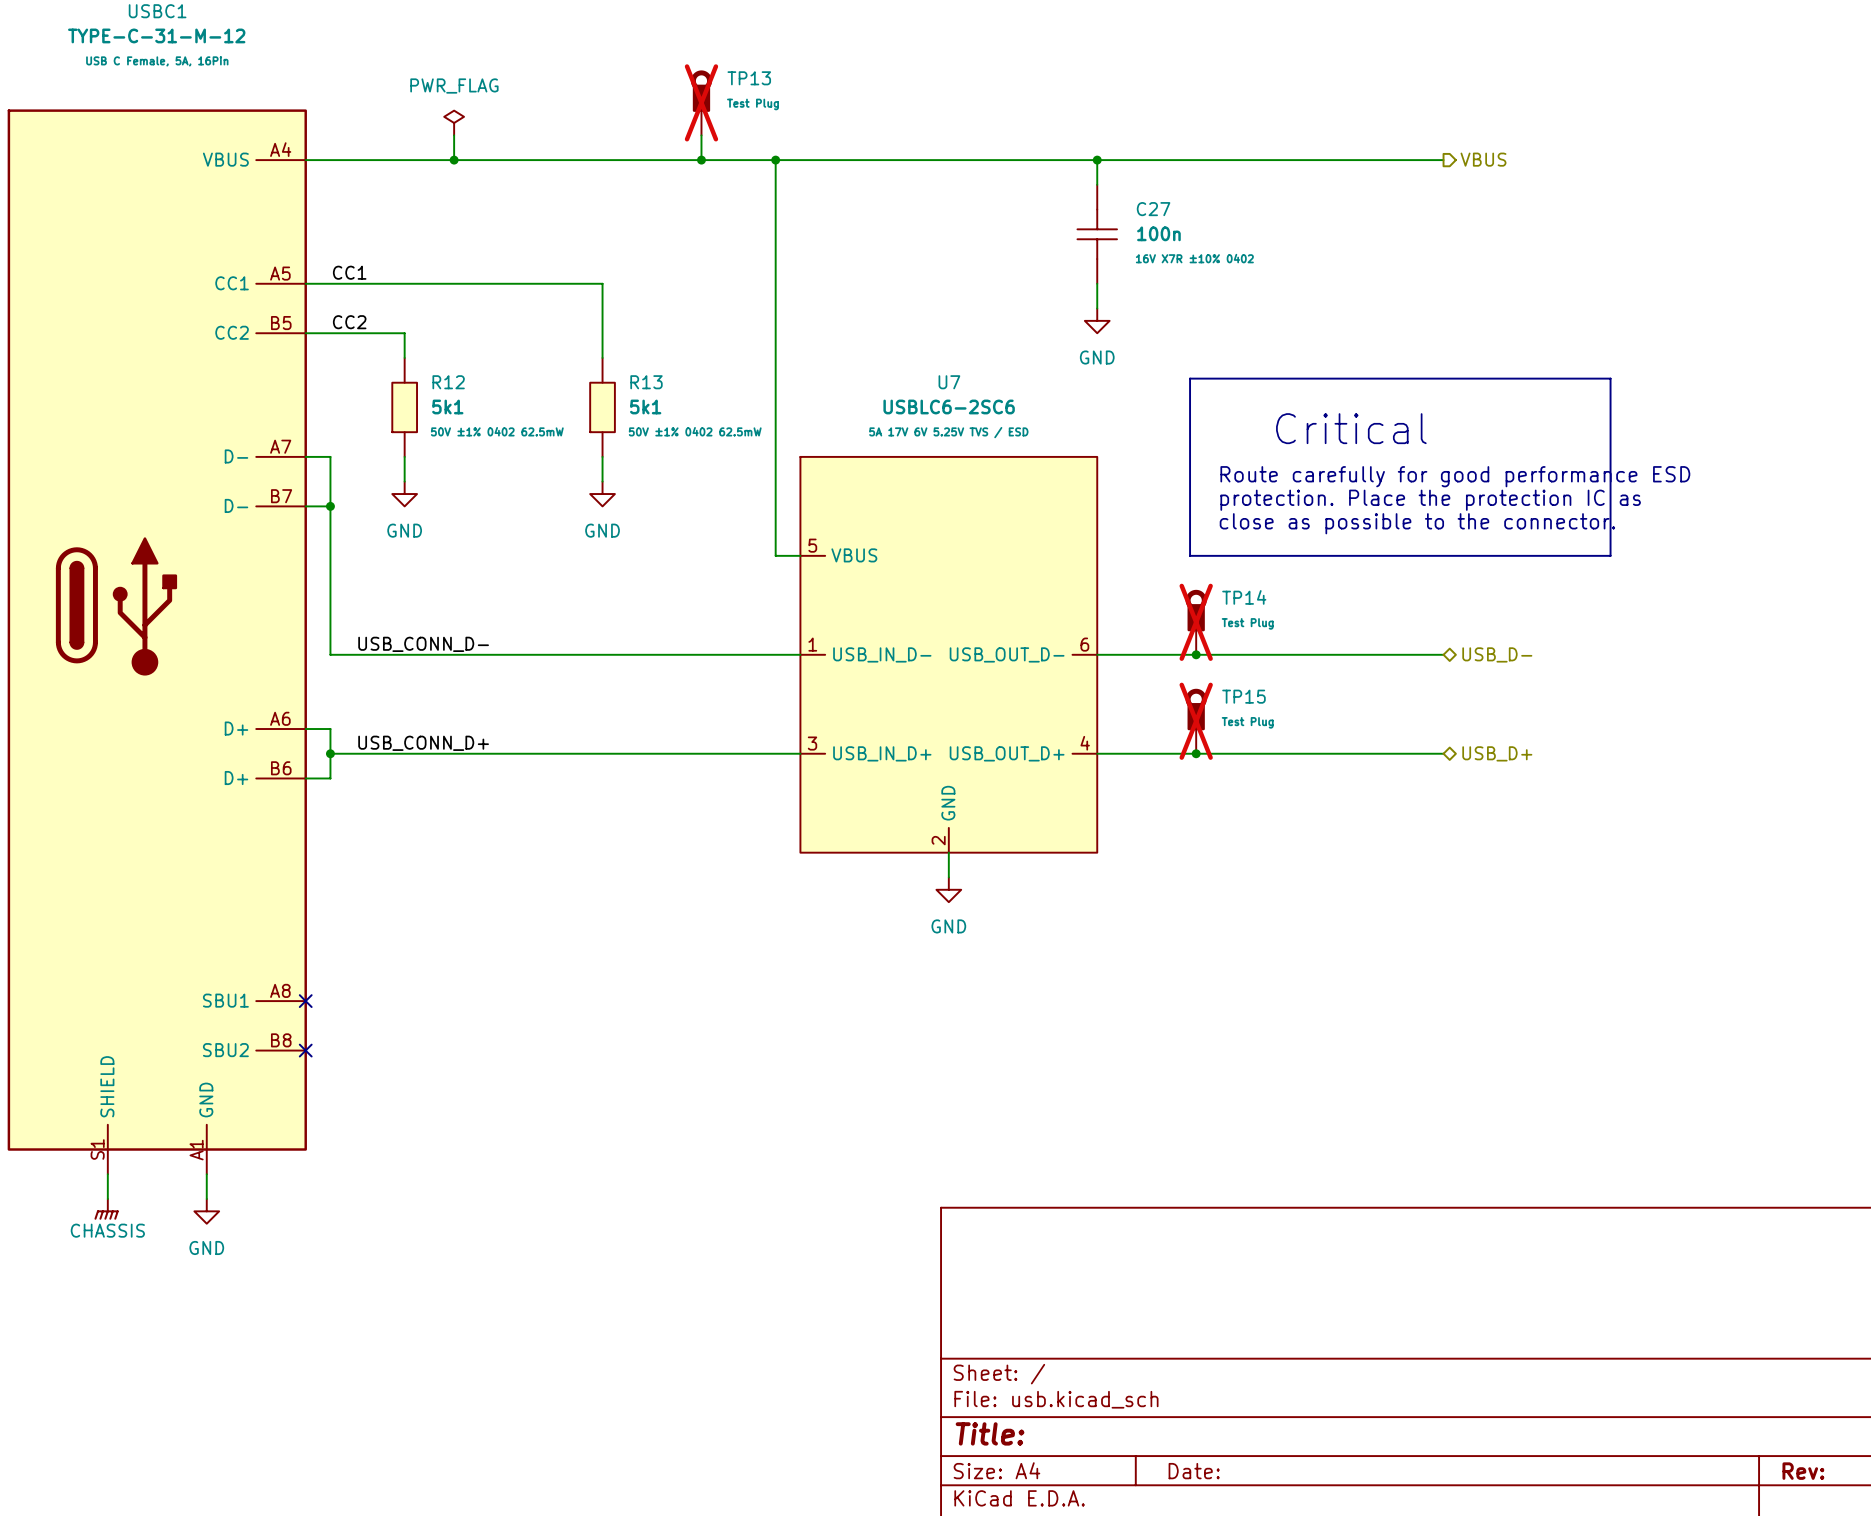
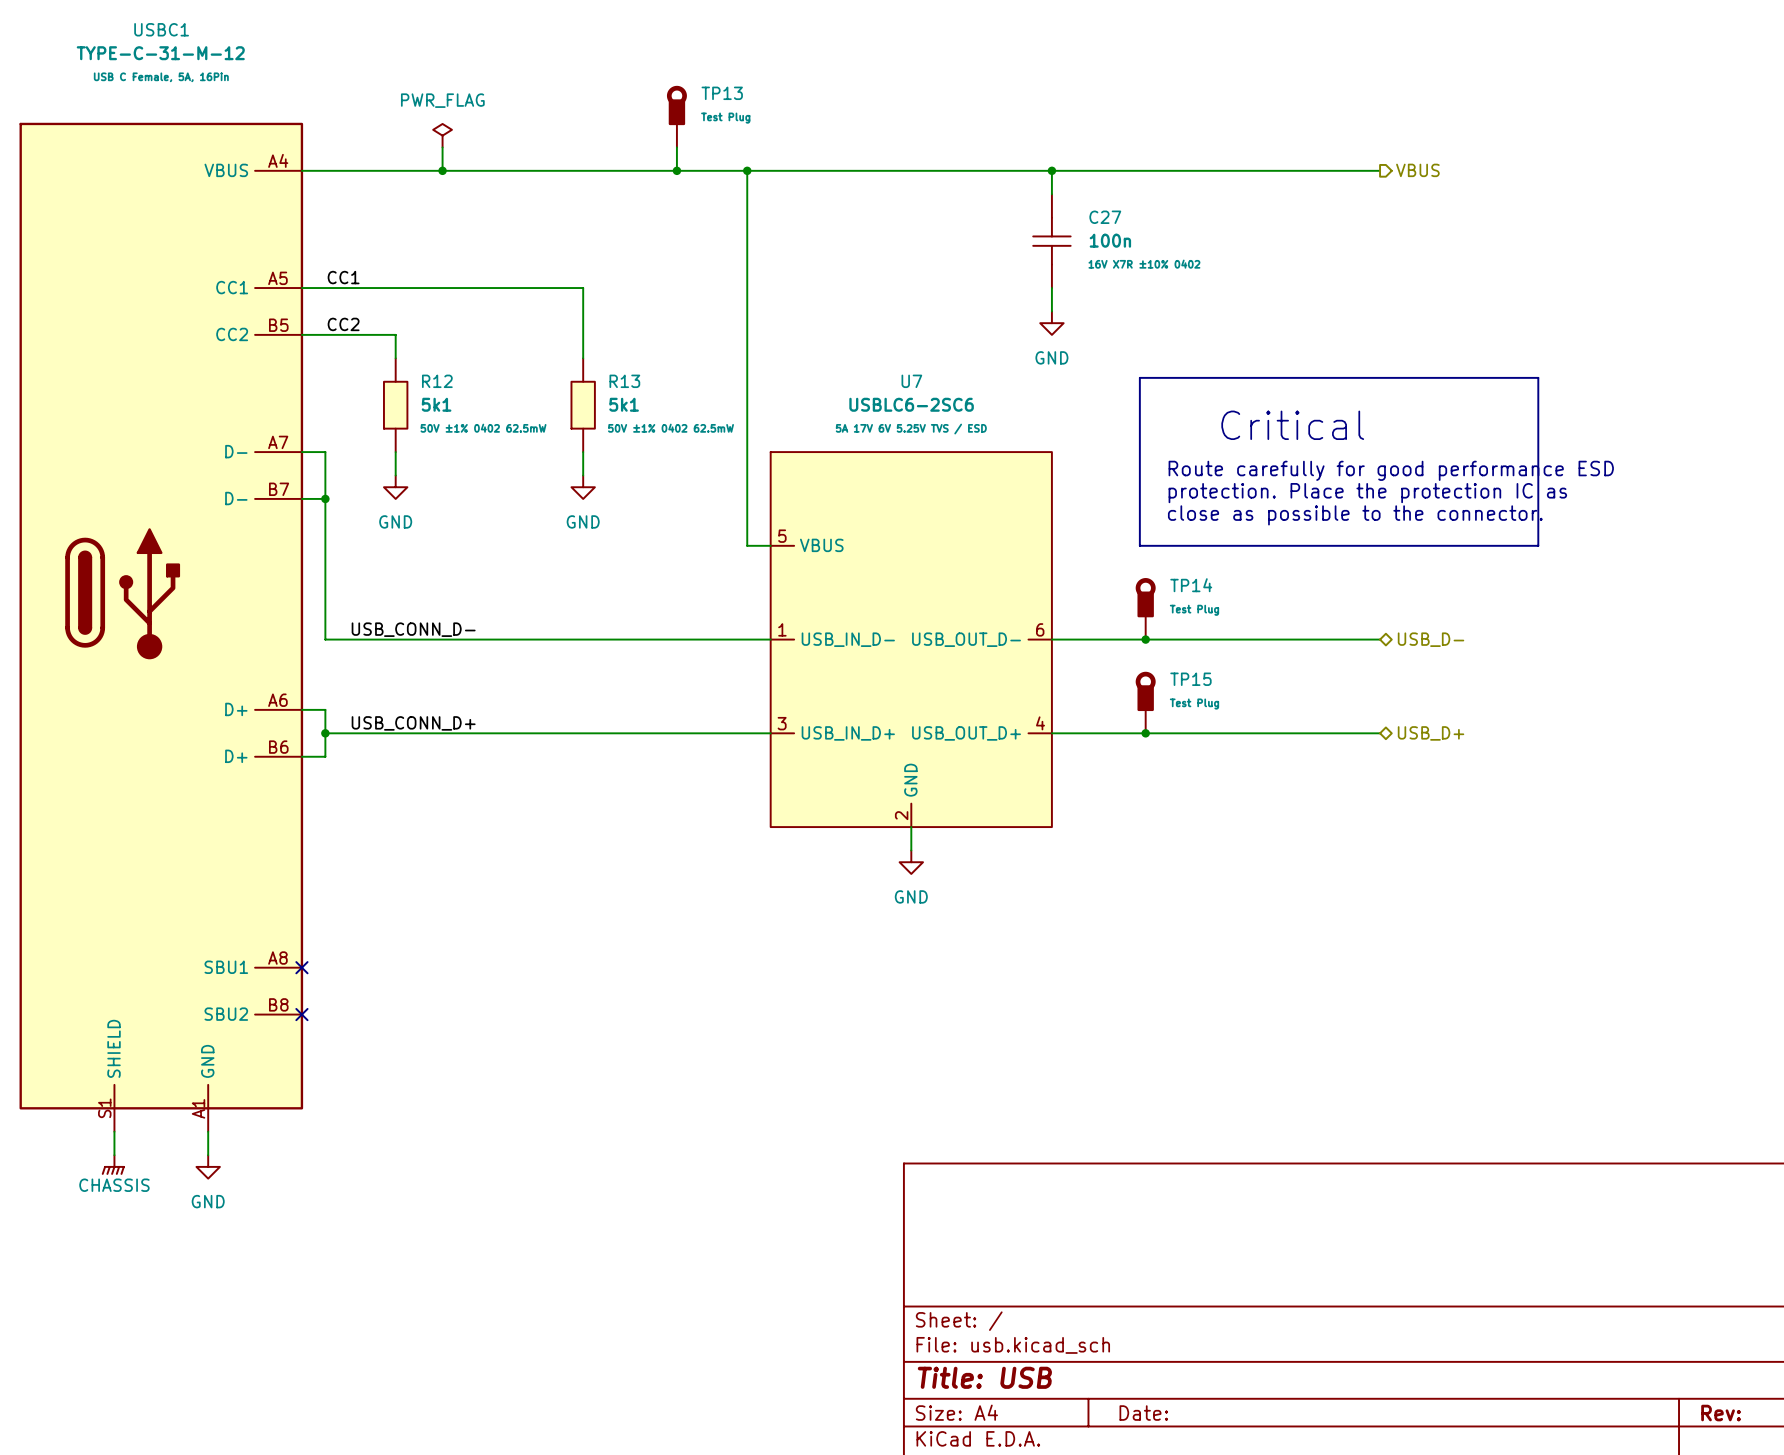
TP13 do-not-place cross: (701, 102) -> none
TP14 do-not-place cross: (1196, 622) -> none
TP15 do-not-place cross: (1196, 721) -> none
title block: Title: (990, 1433) -> Title: USB (984, 1377)

